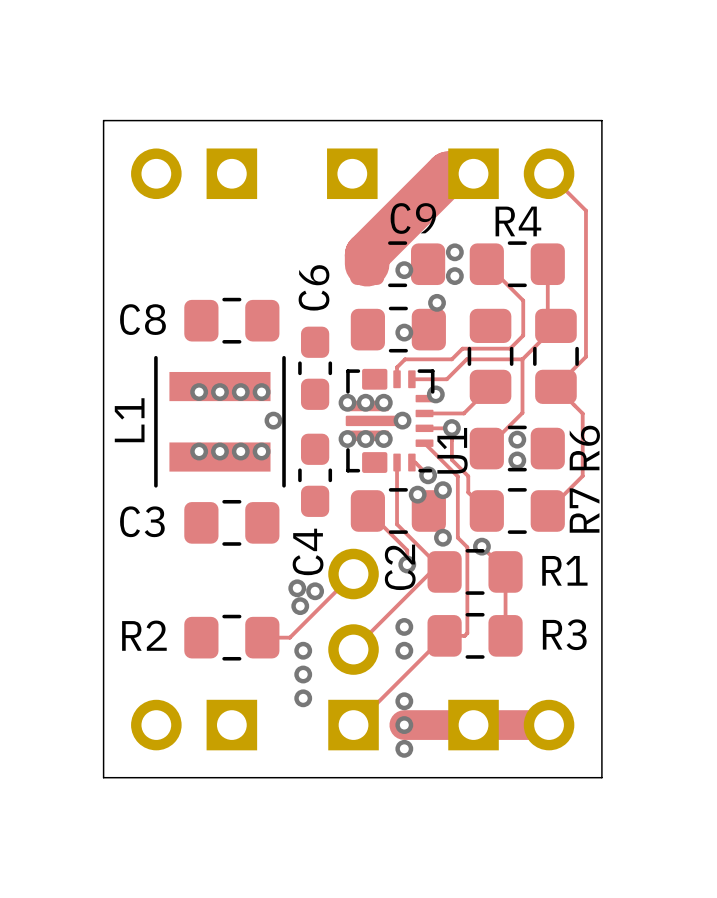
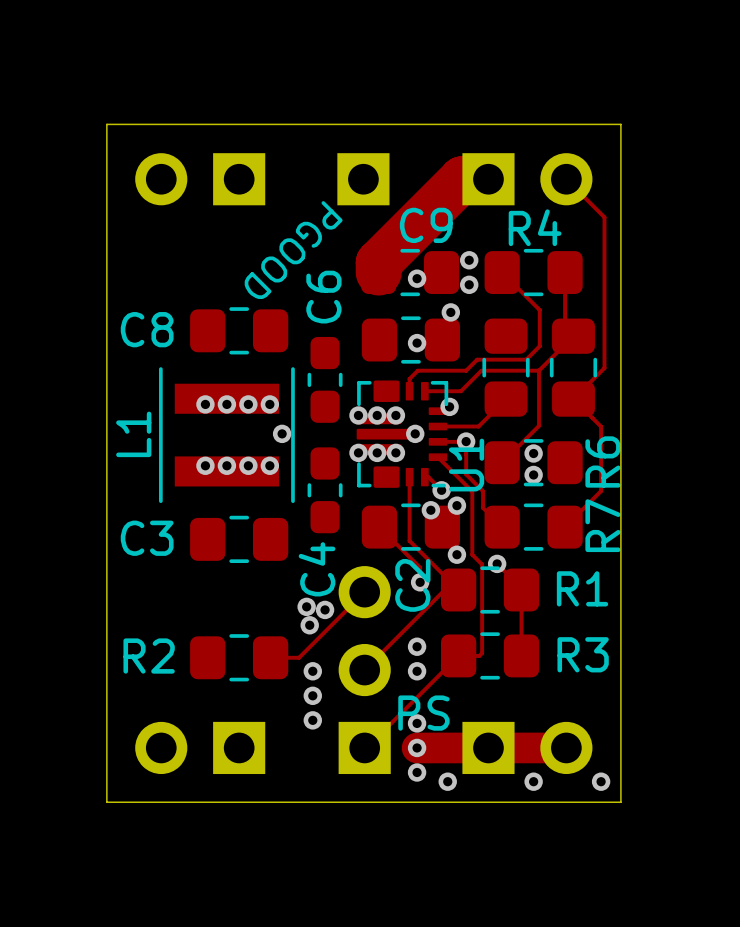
text: none -> PGOOD (293, 250)
text: none -> PS (423, 713)
via: none -> (447, 781)
via: none -> (533, 781)
via: none -> (601, 781)

